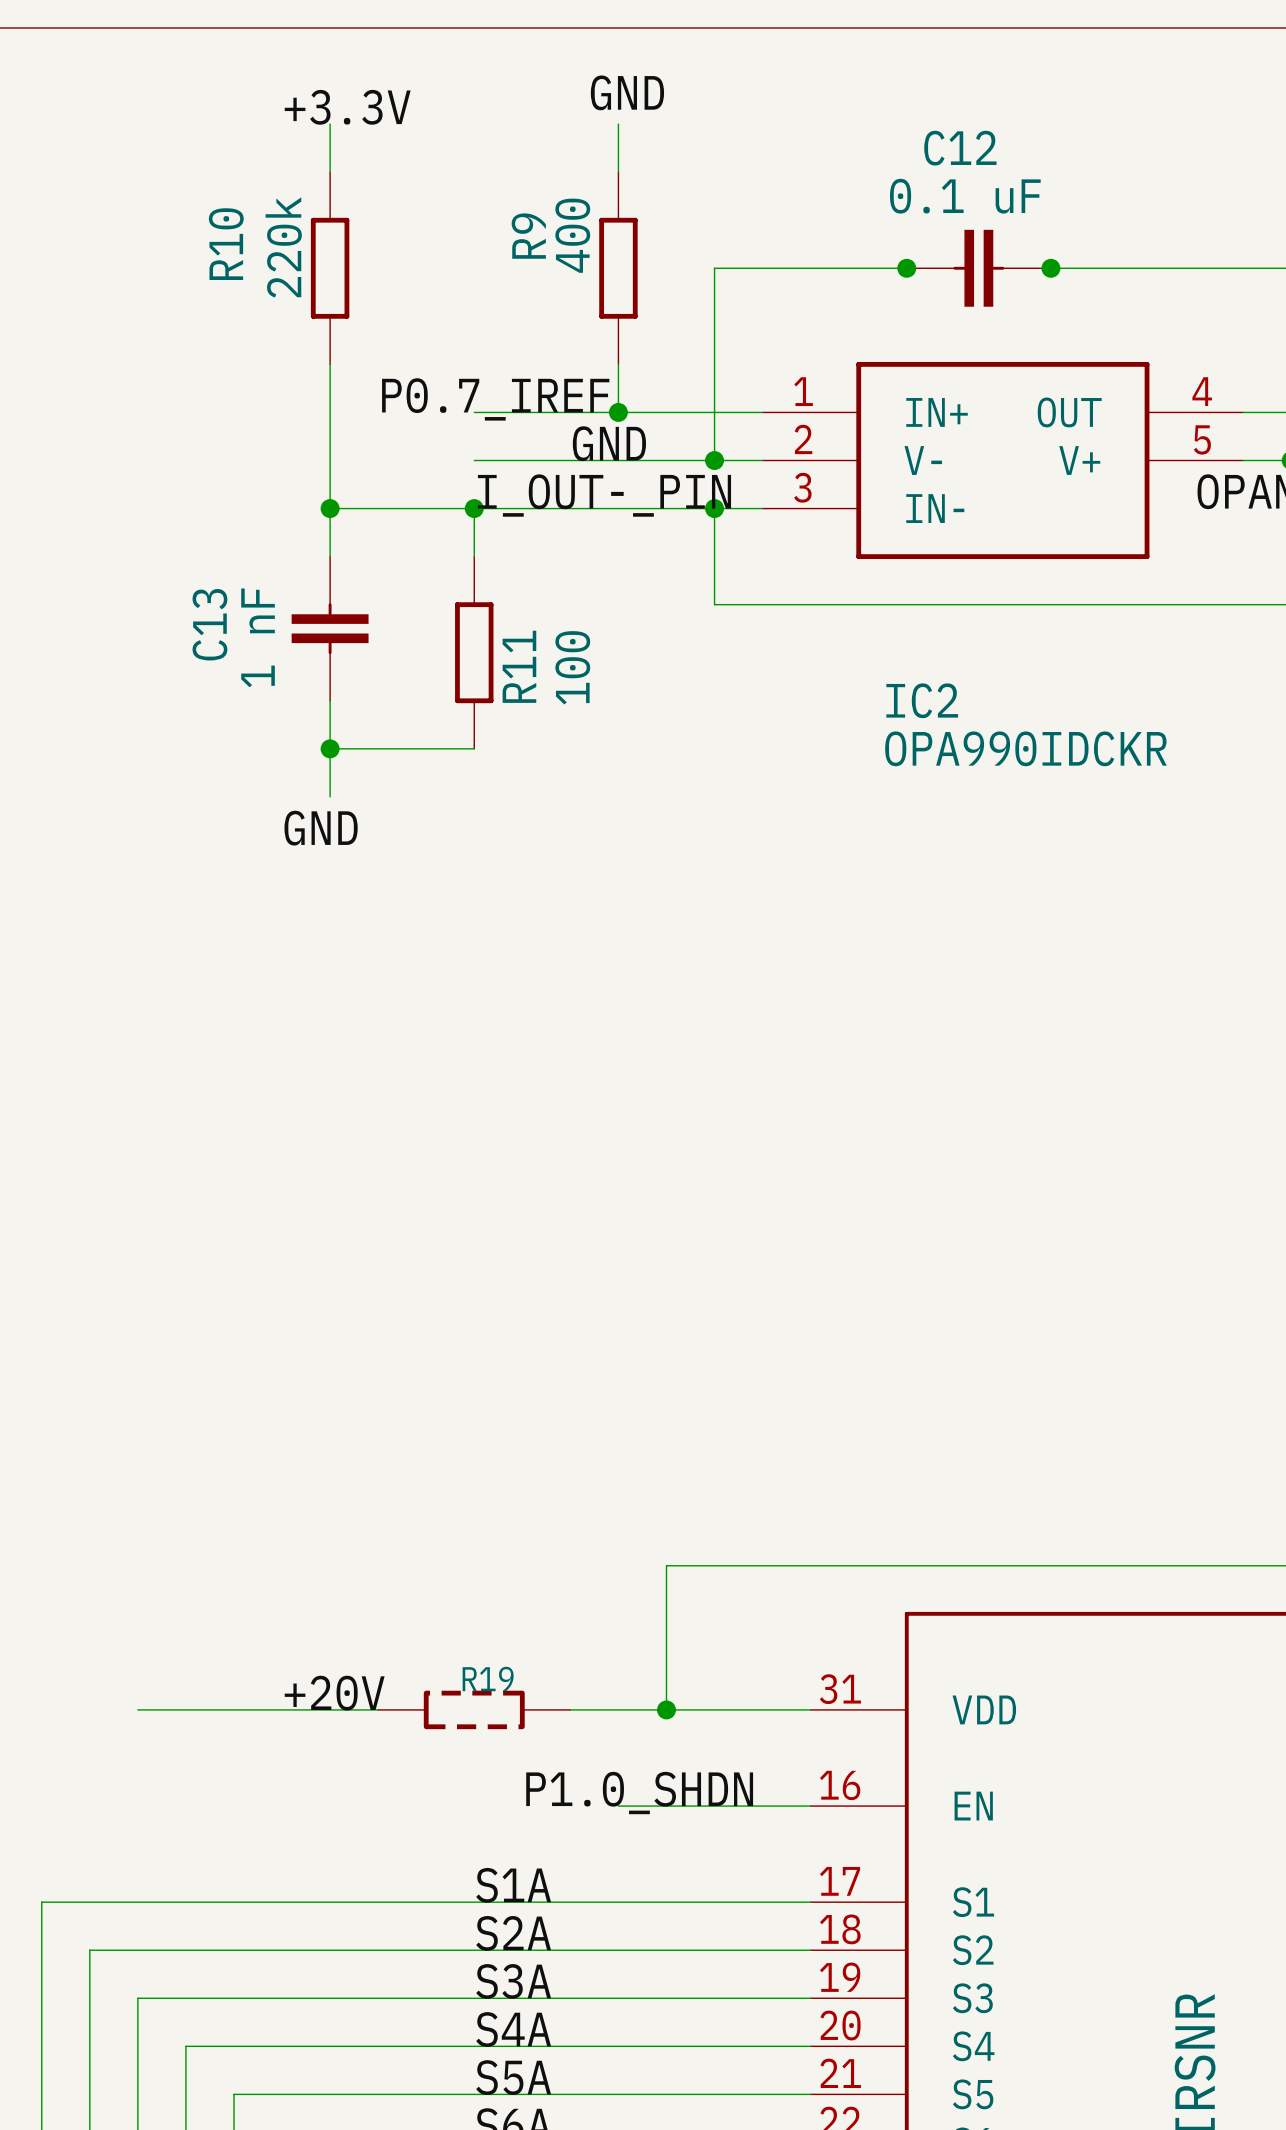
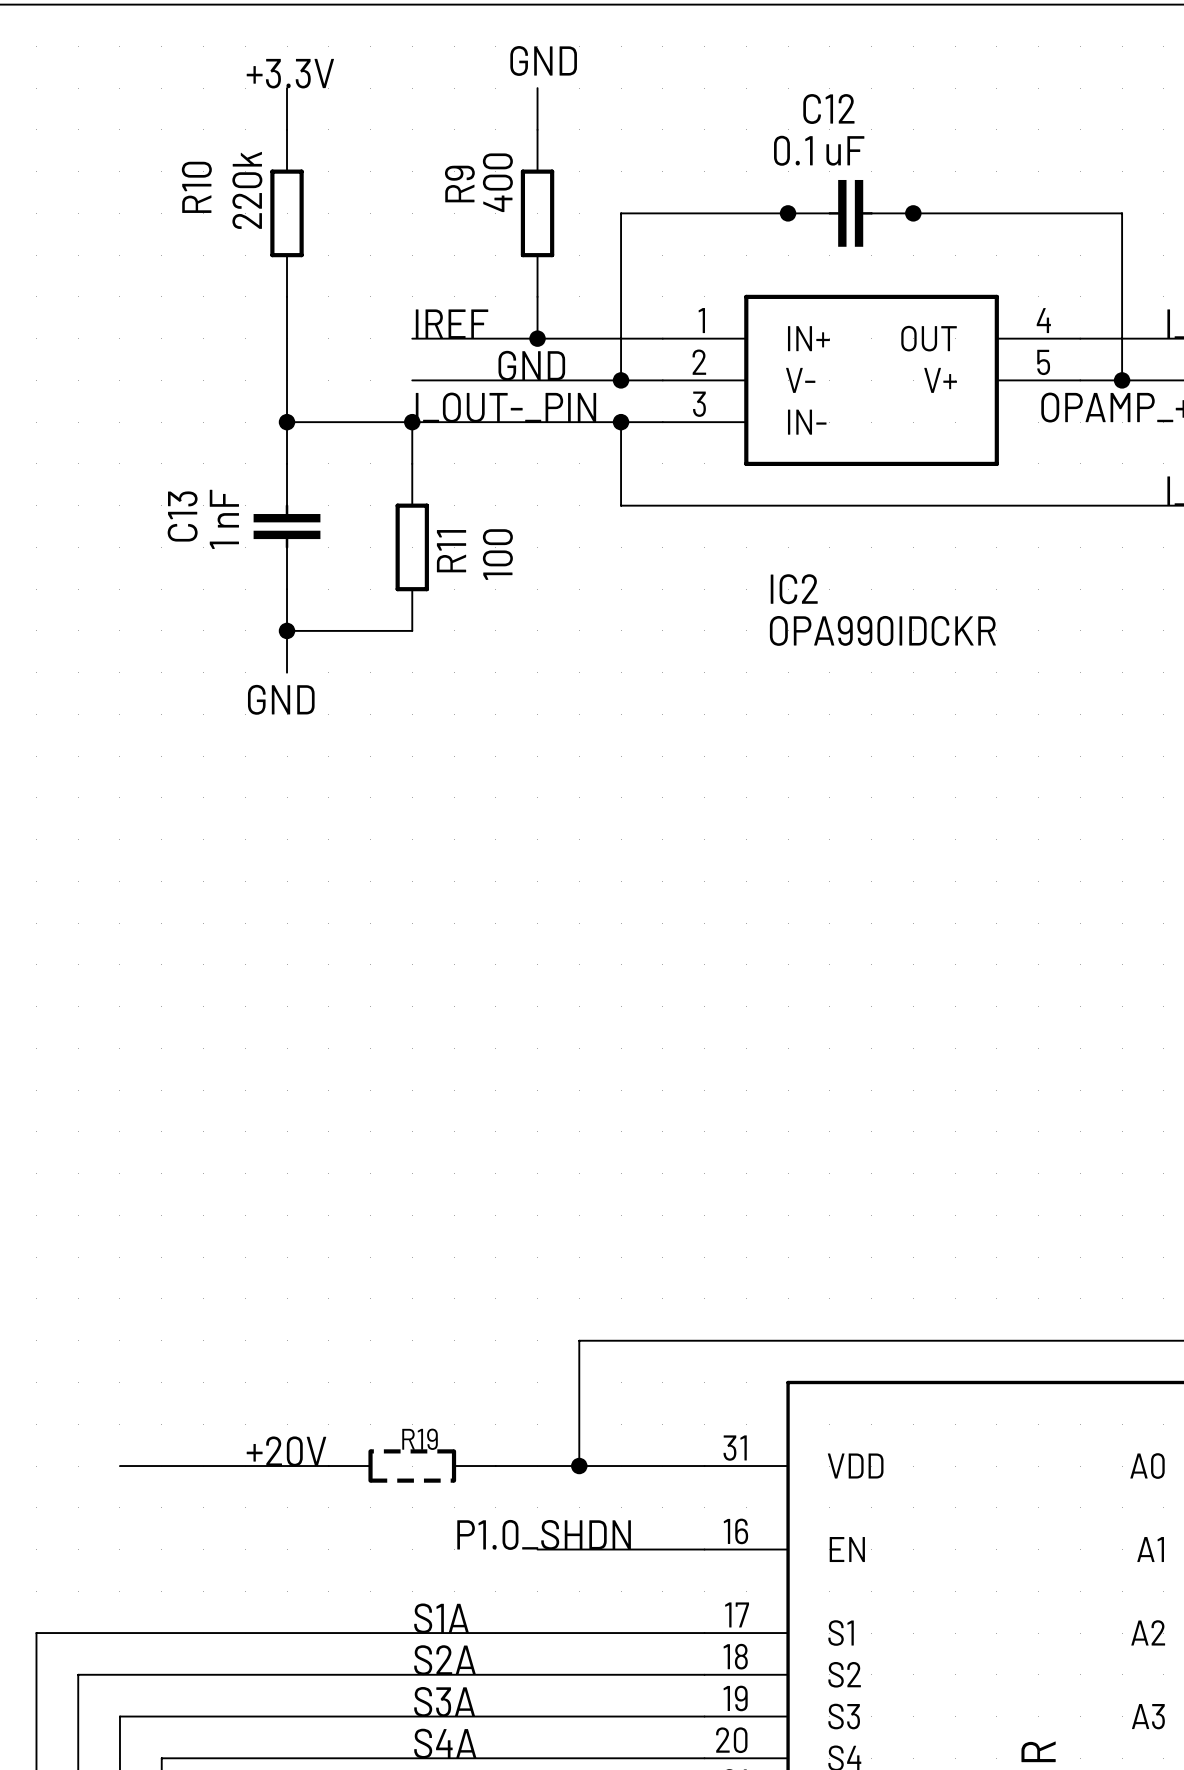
label: P0.7_IREF (495, 399) -> IREF (452, 324)

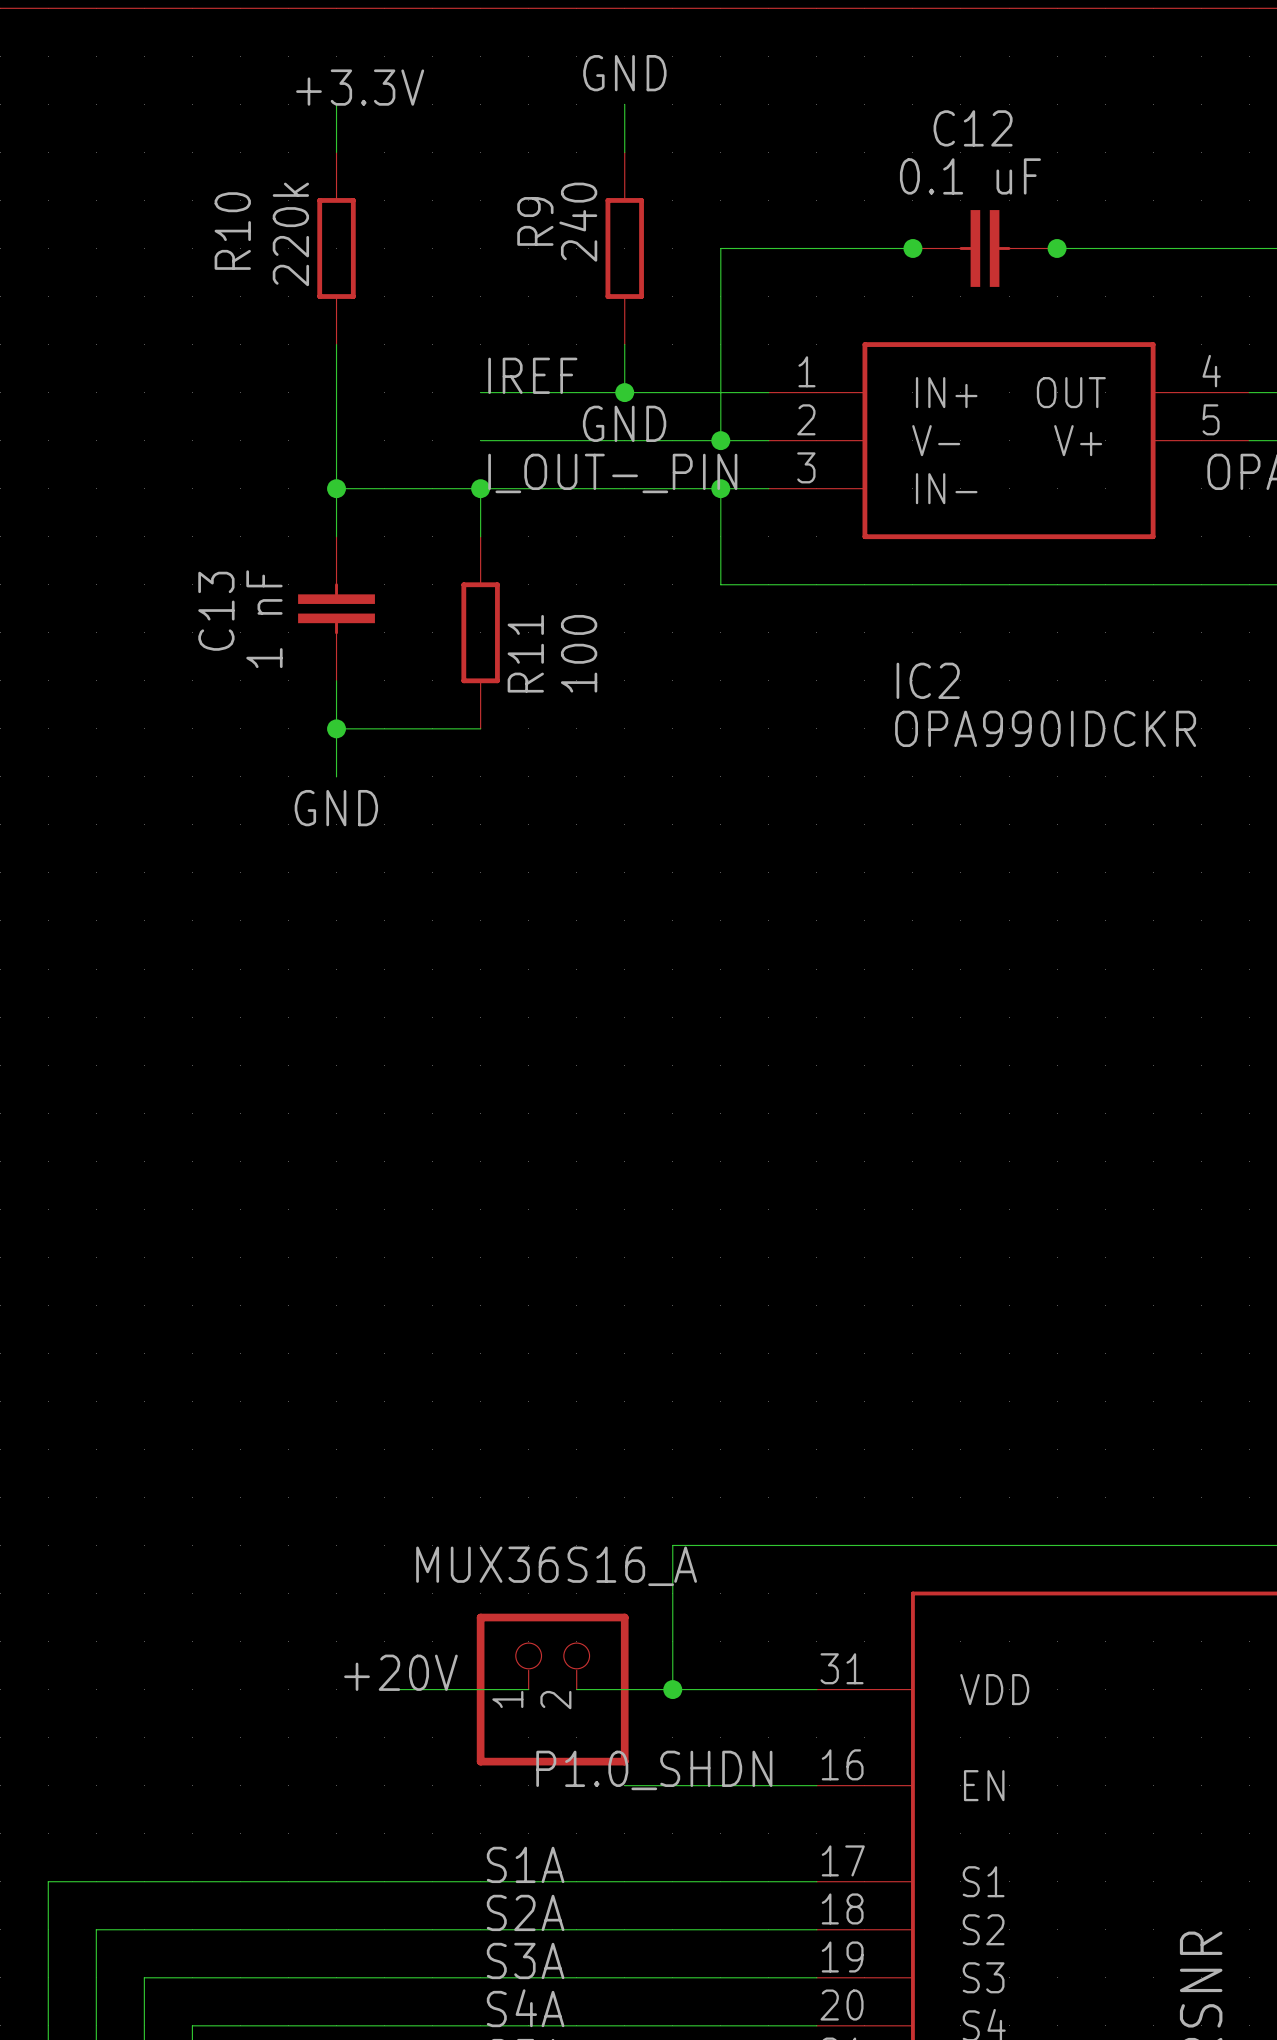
R9 value: 400 (497, 182) -> 240 (578, 222)
label position: +20V (286, 1451) -> +20V (400, 1672)
wire: (119, 1466) (328, 1466) -> (528, 1689) (384, 1689)
R19: (412, 1466) -> none
MUX36S16_A: none -> (552, 1689)

